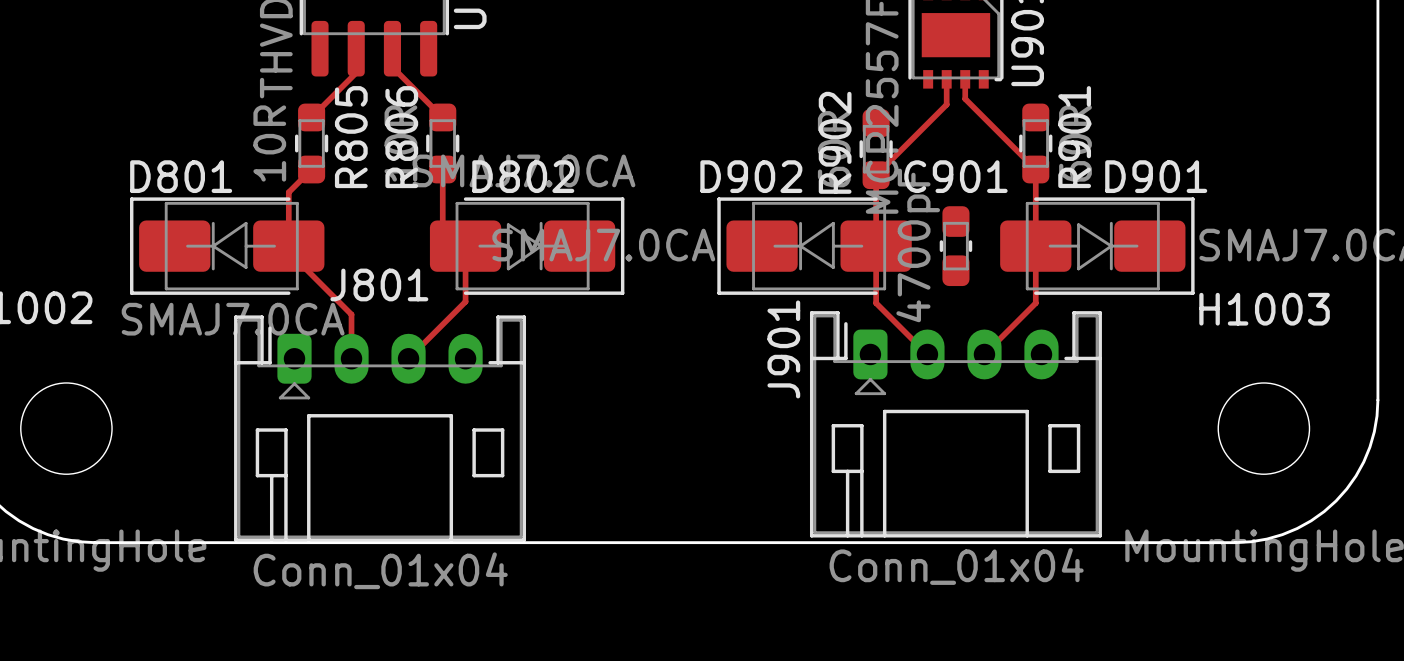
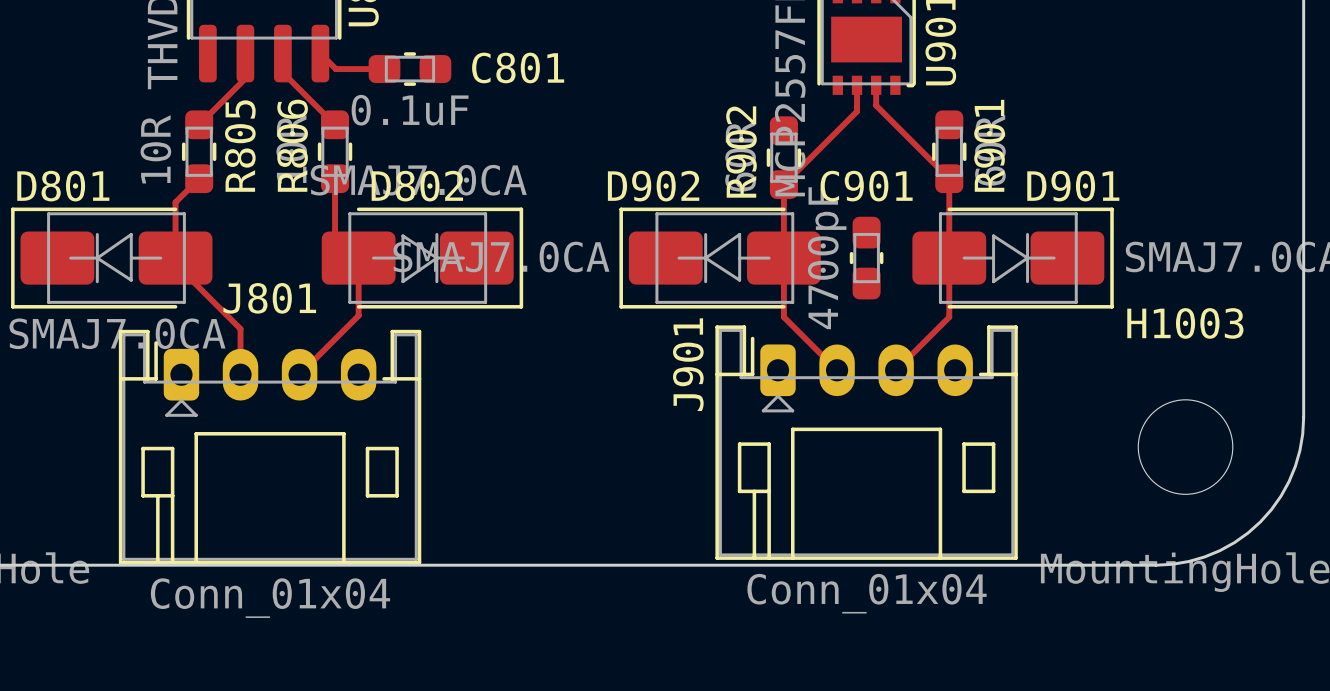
top track: none -> (320, 53) (335, 69) (384, 69)
C801: none -> 0.1uF (409, 69)

